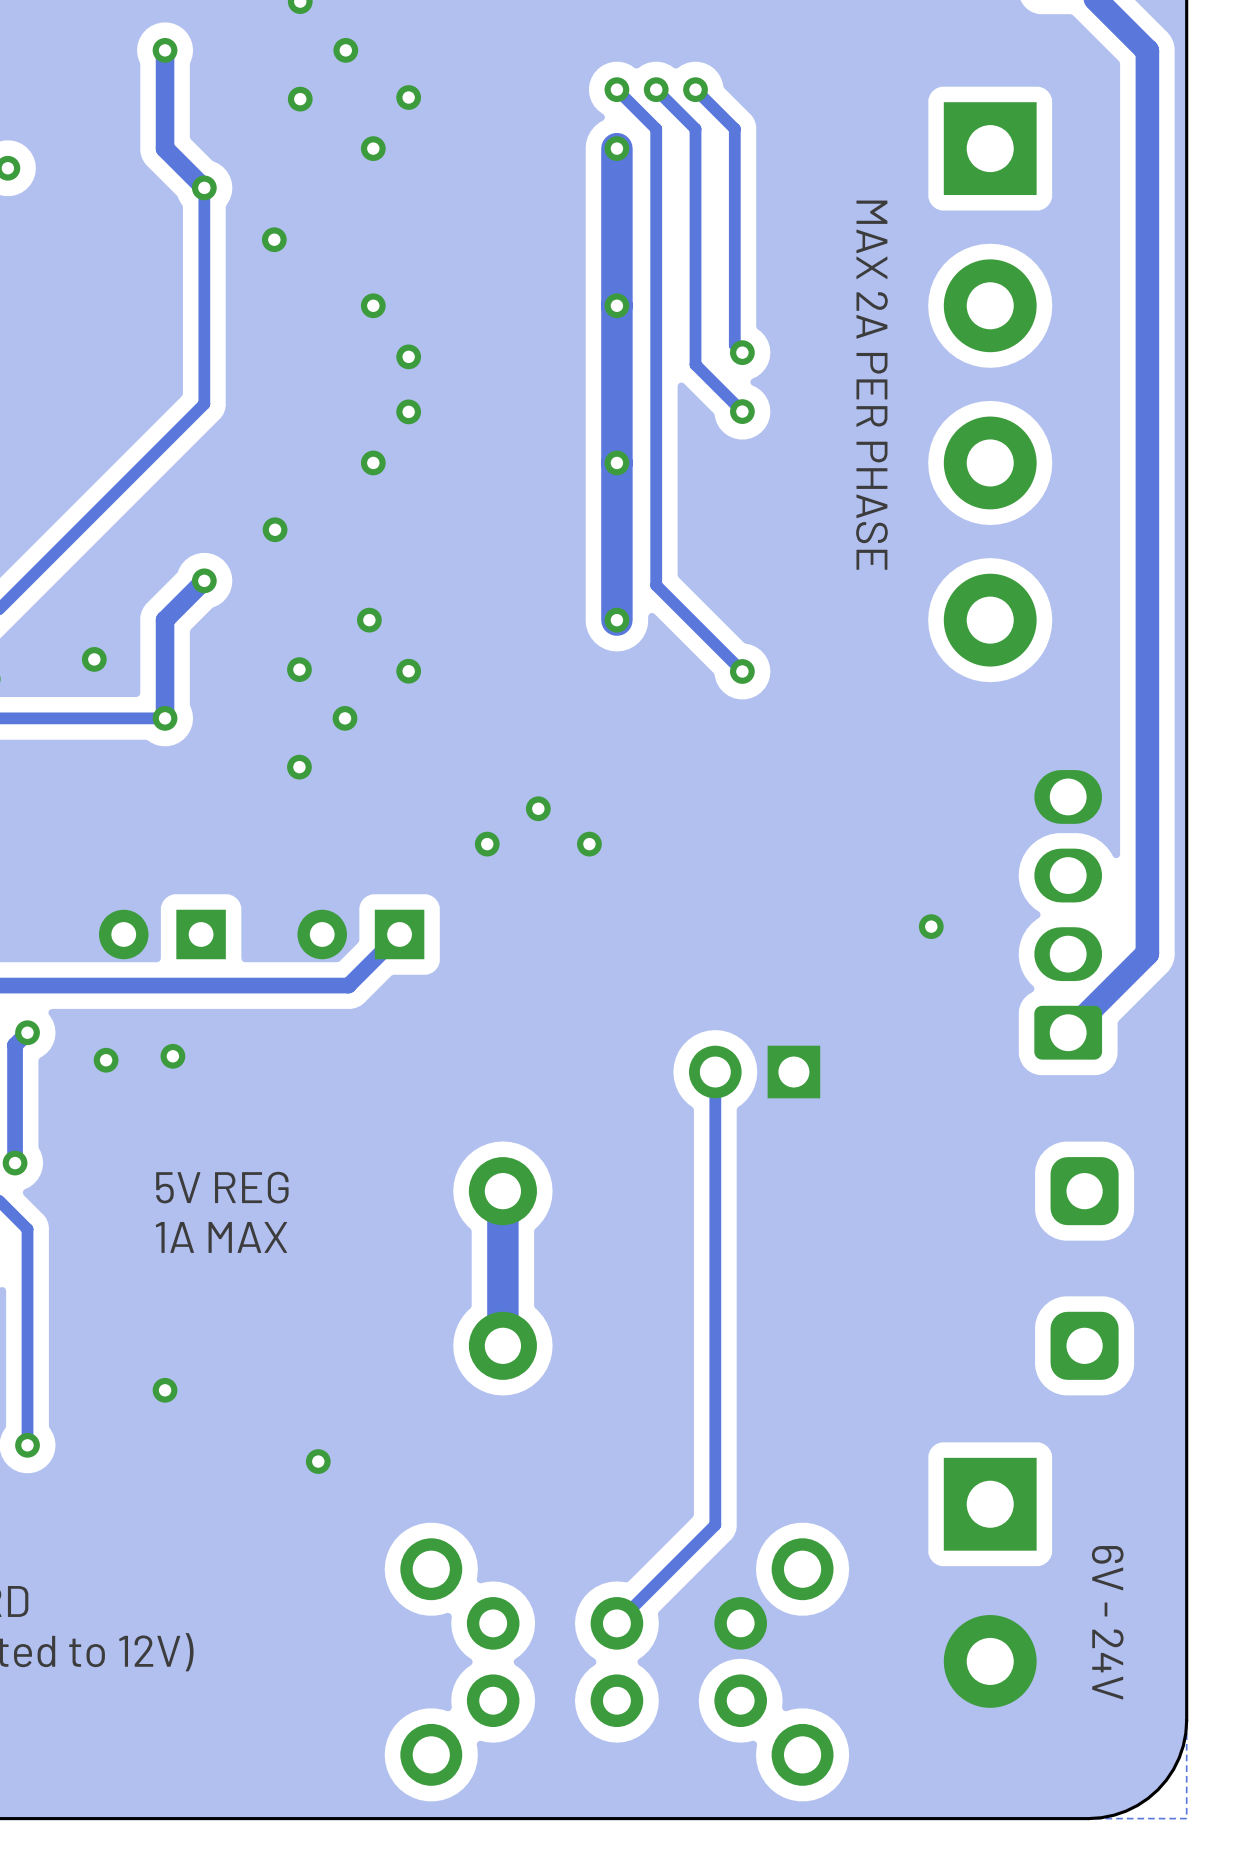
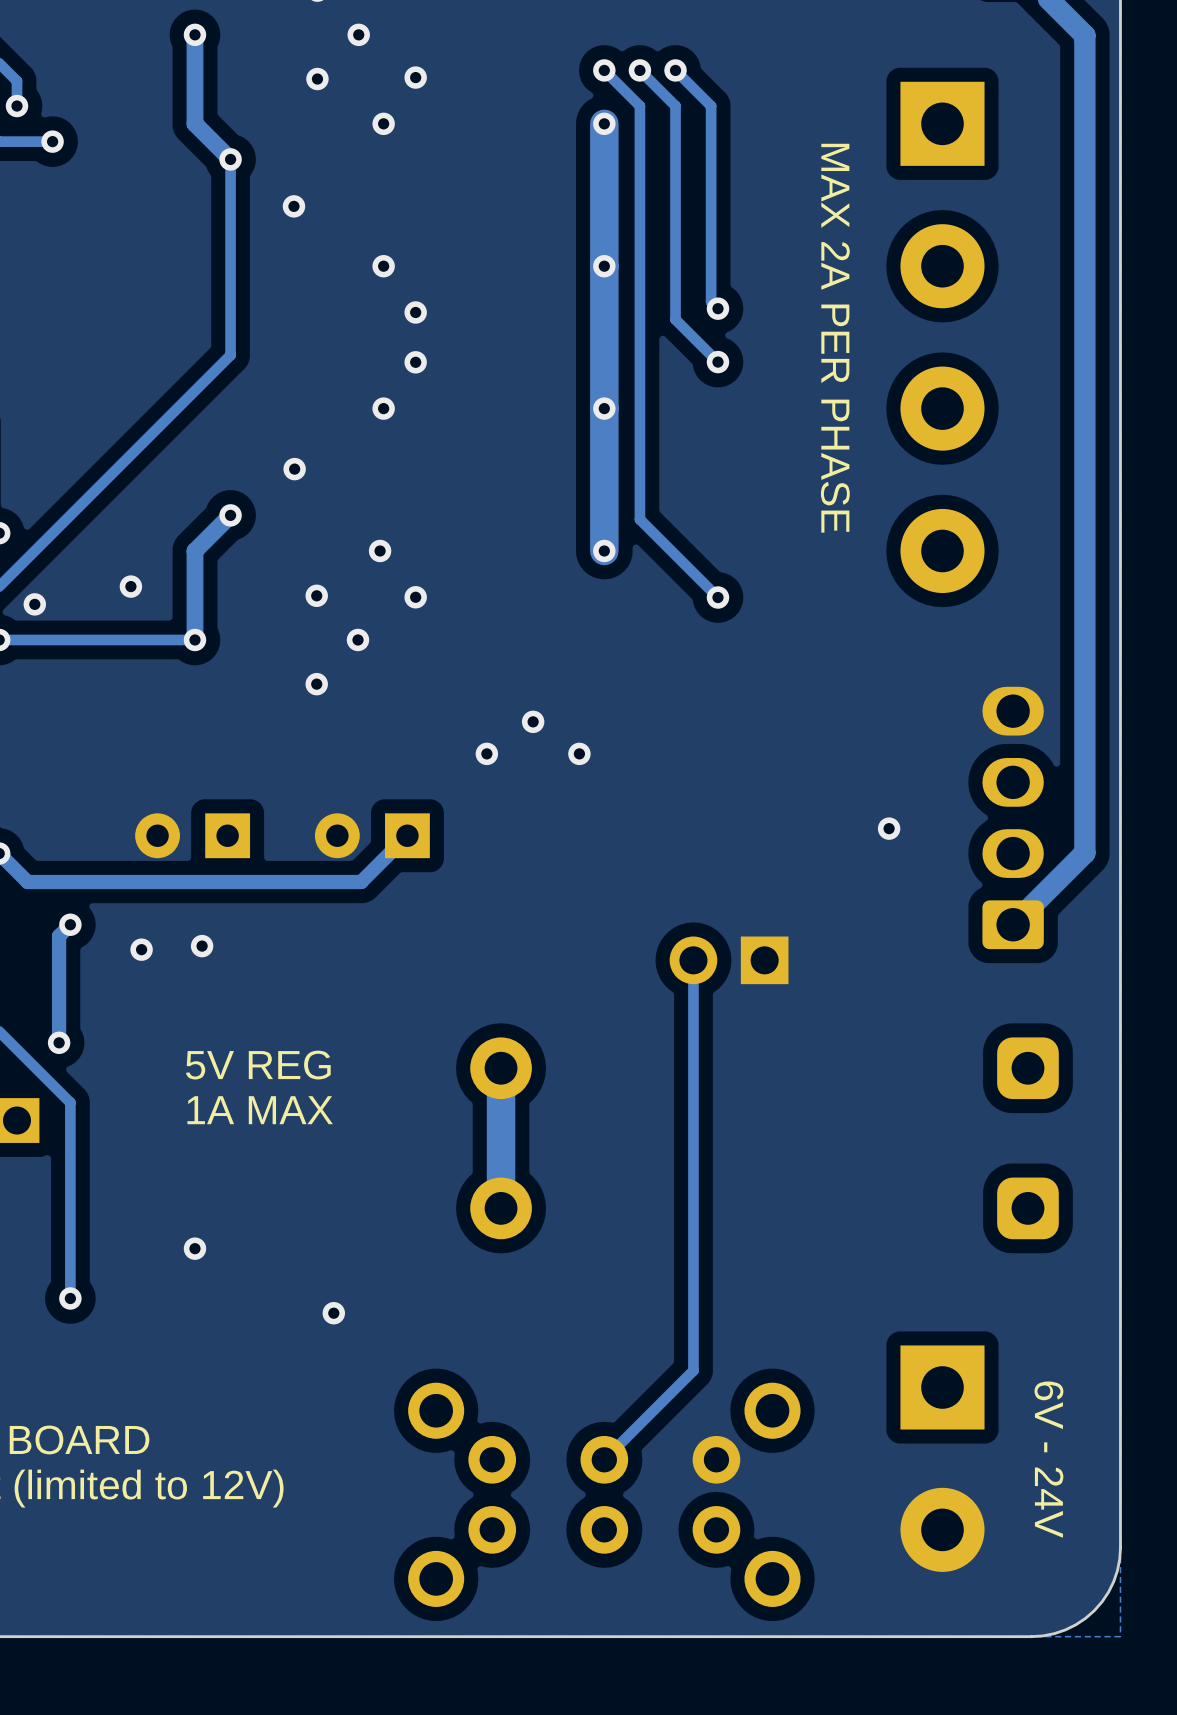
part position: (990, 1582) -> (942, 1458)

